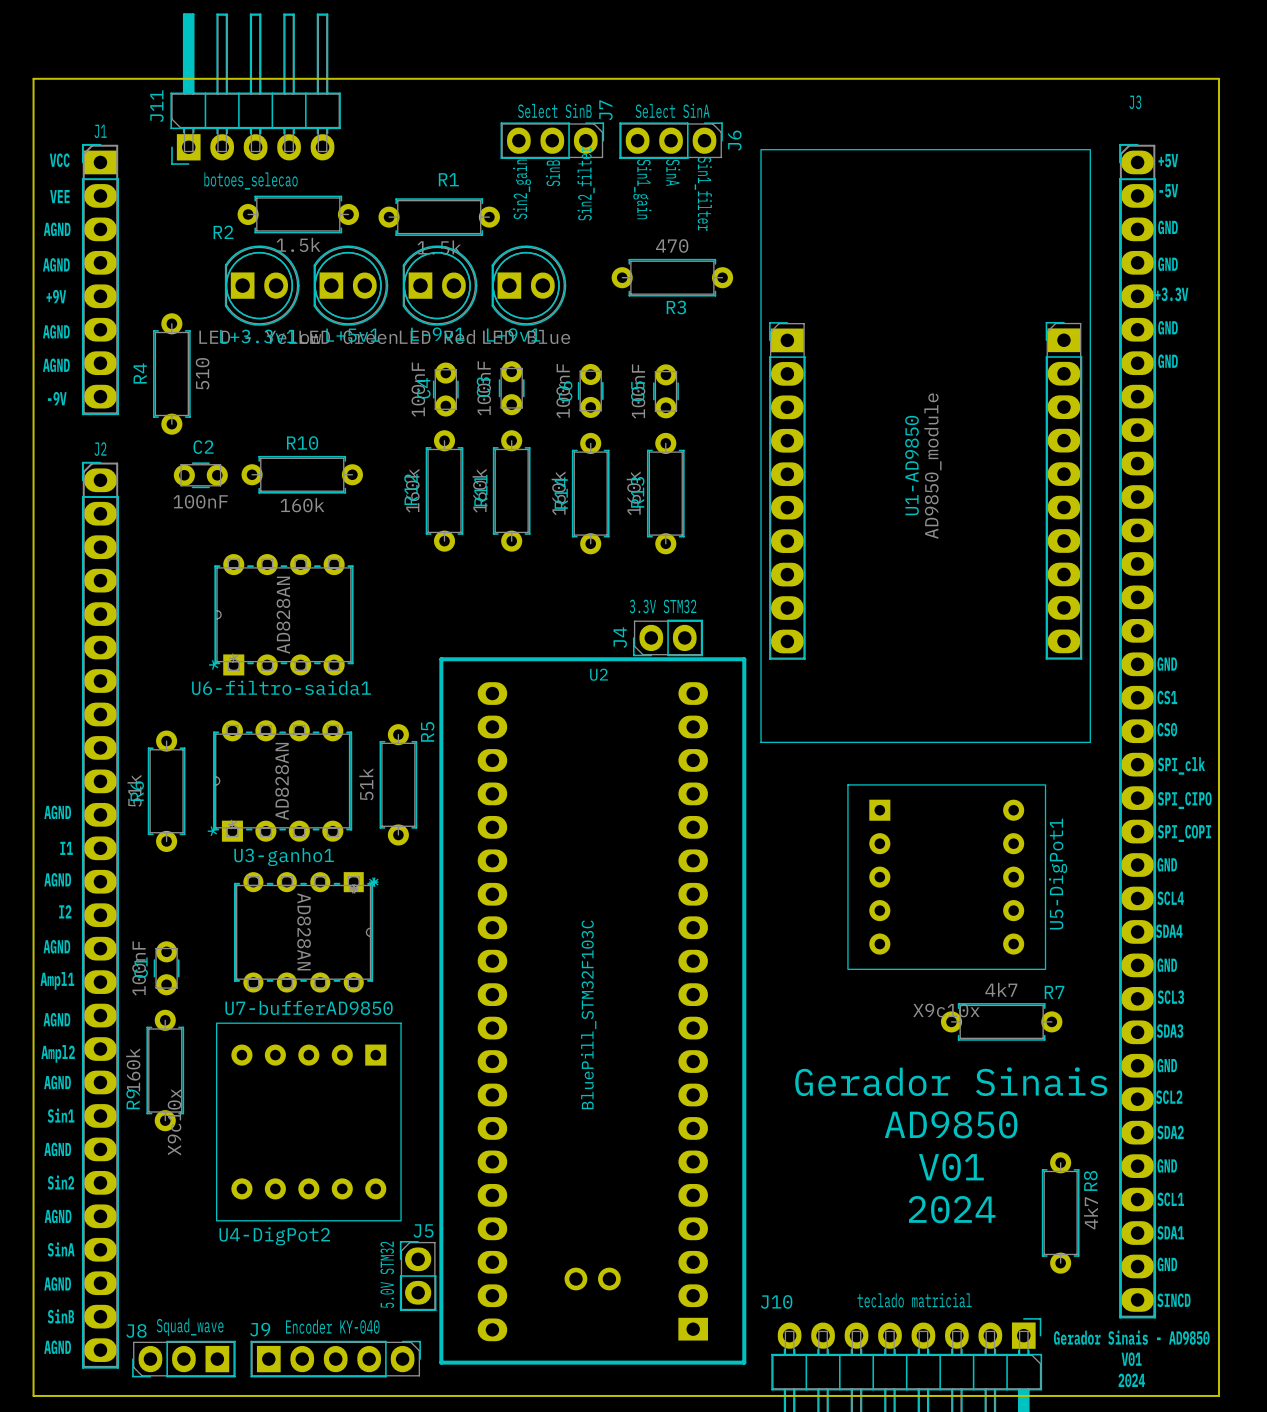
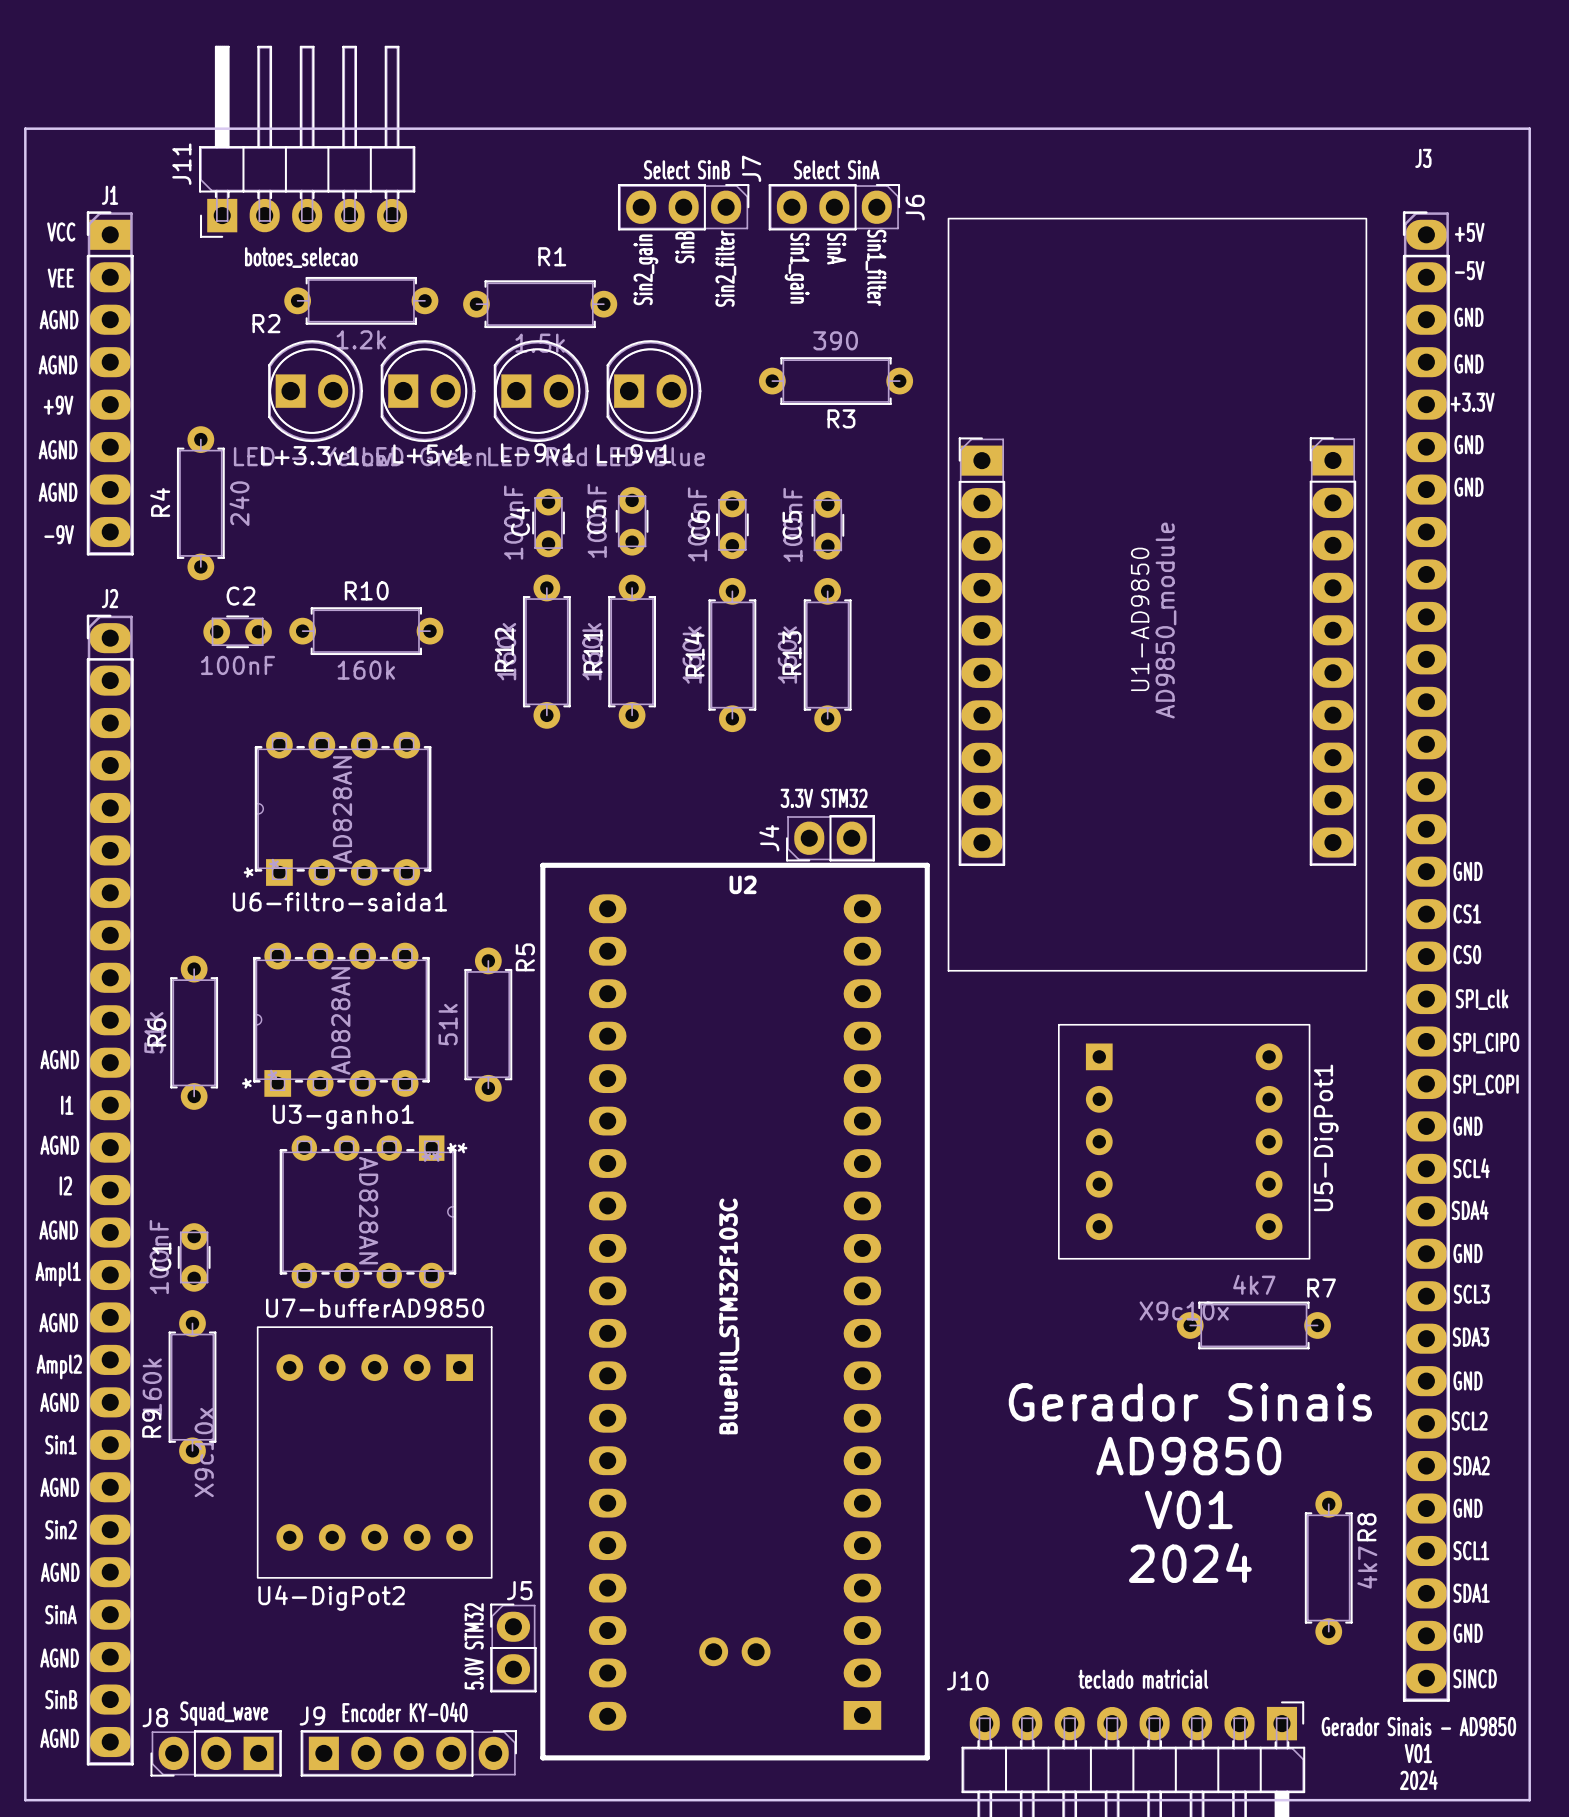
R2 value: 1.5k (298, 244) -> 1.2k (361, 339)
R3 value: 470 (672, 245) -> 390 (835, 340)
R4 value: 510 (202, 373) -> 240 (239, 503)

